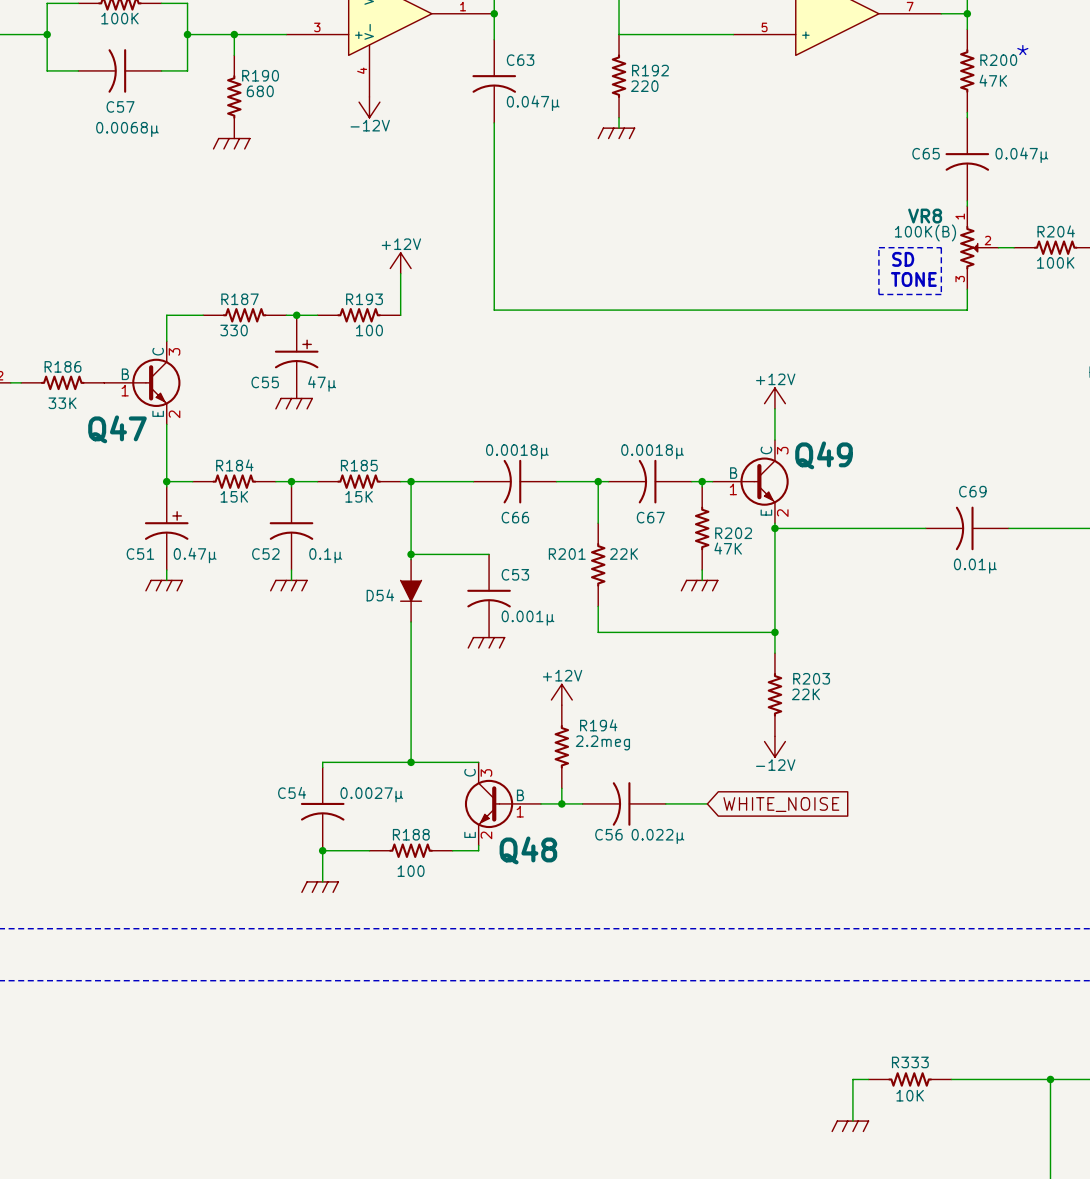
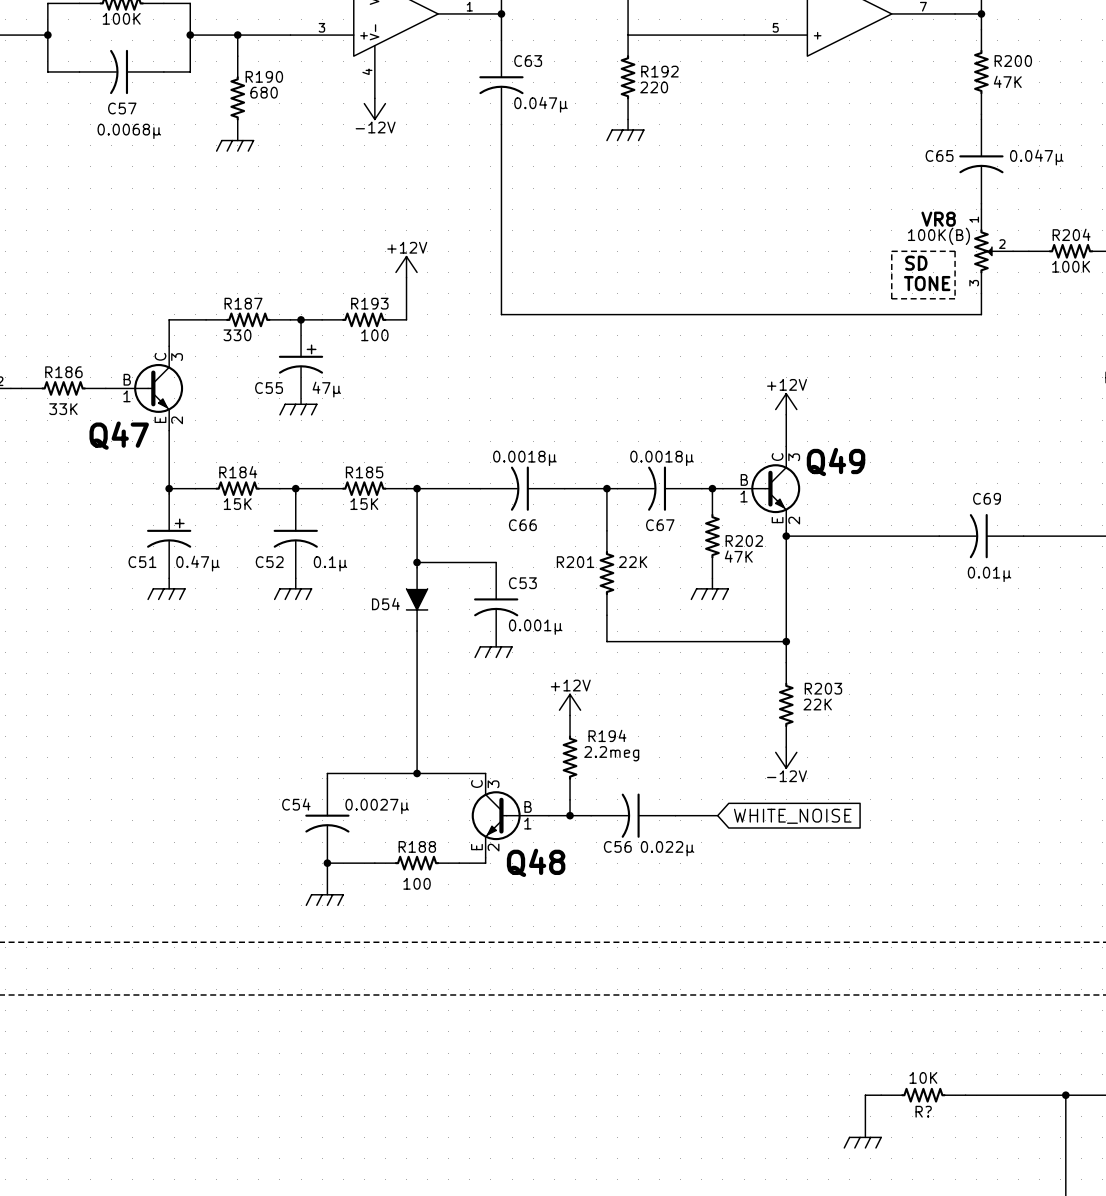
text: * (1022, 50) -> none
R333: 10K (910, 1079) -> none
R?: none -> 10K (923, 1095)

